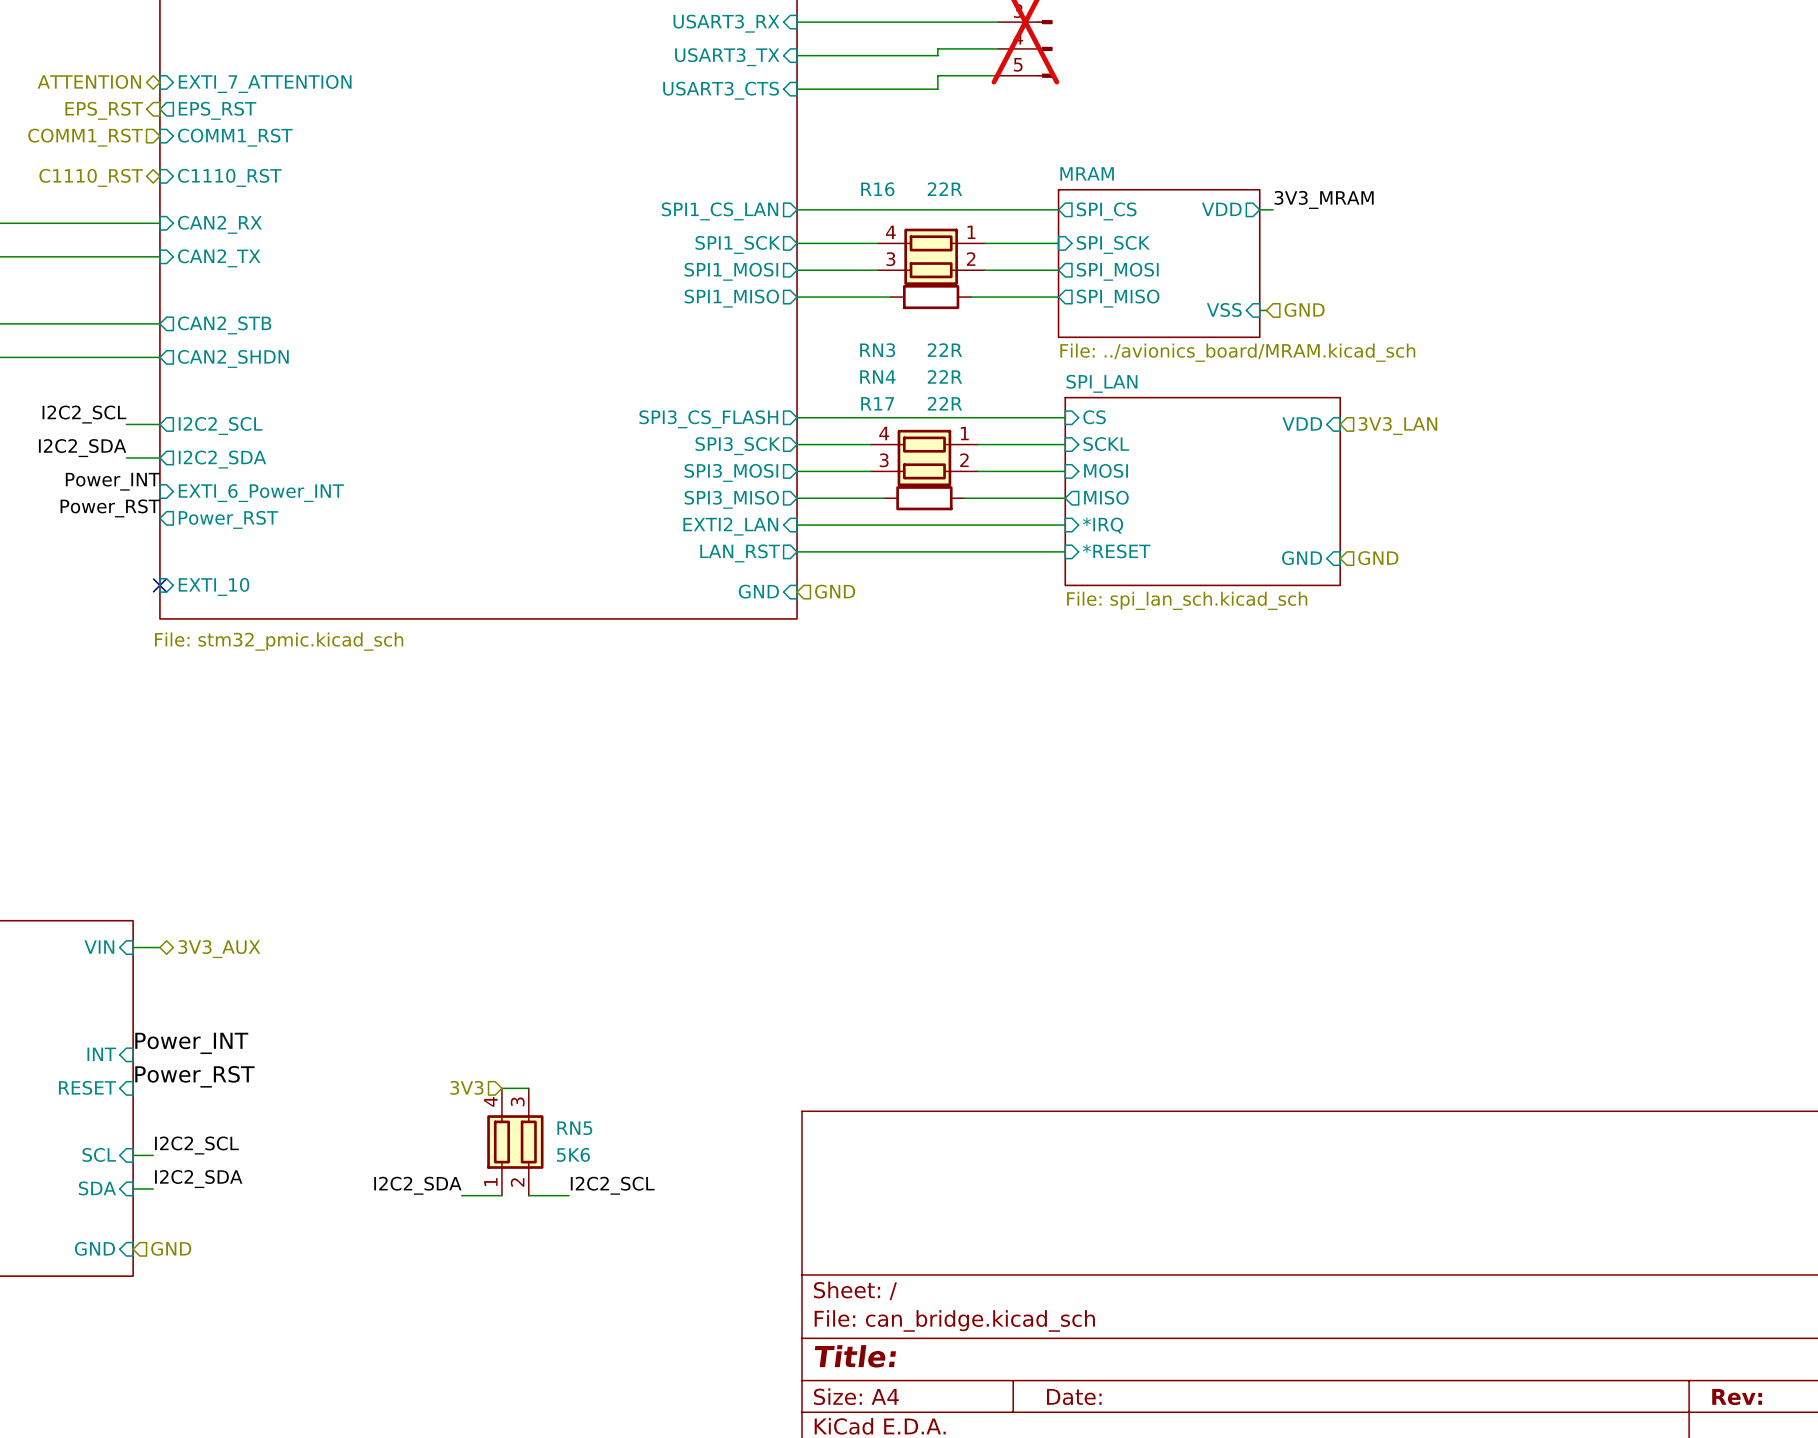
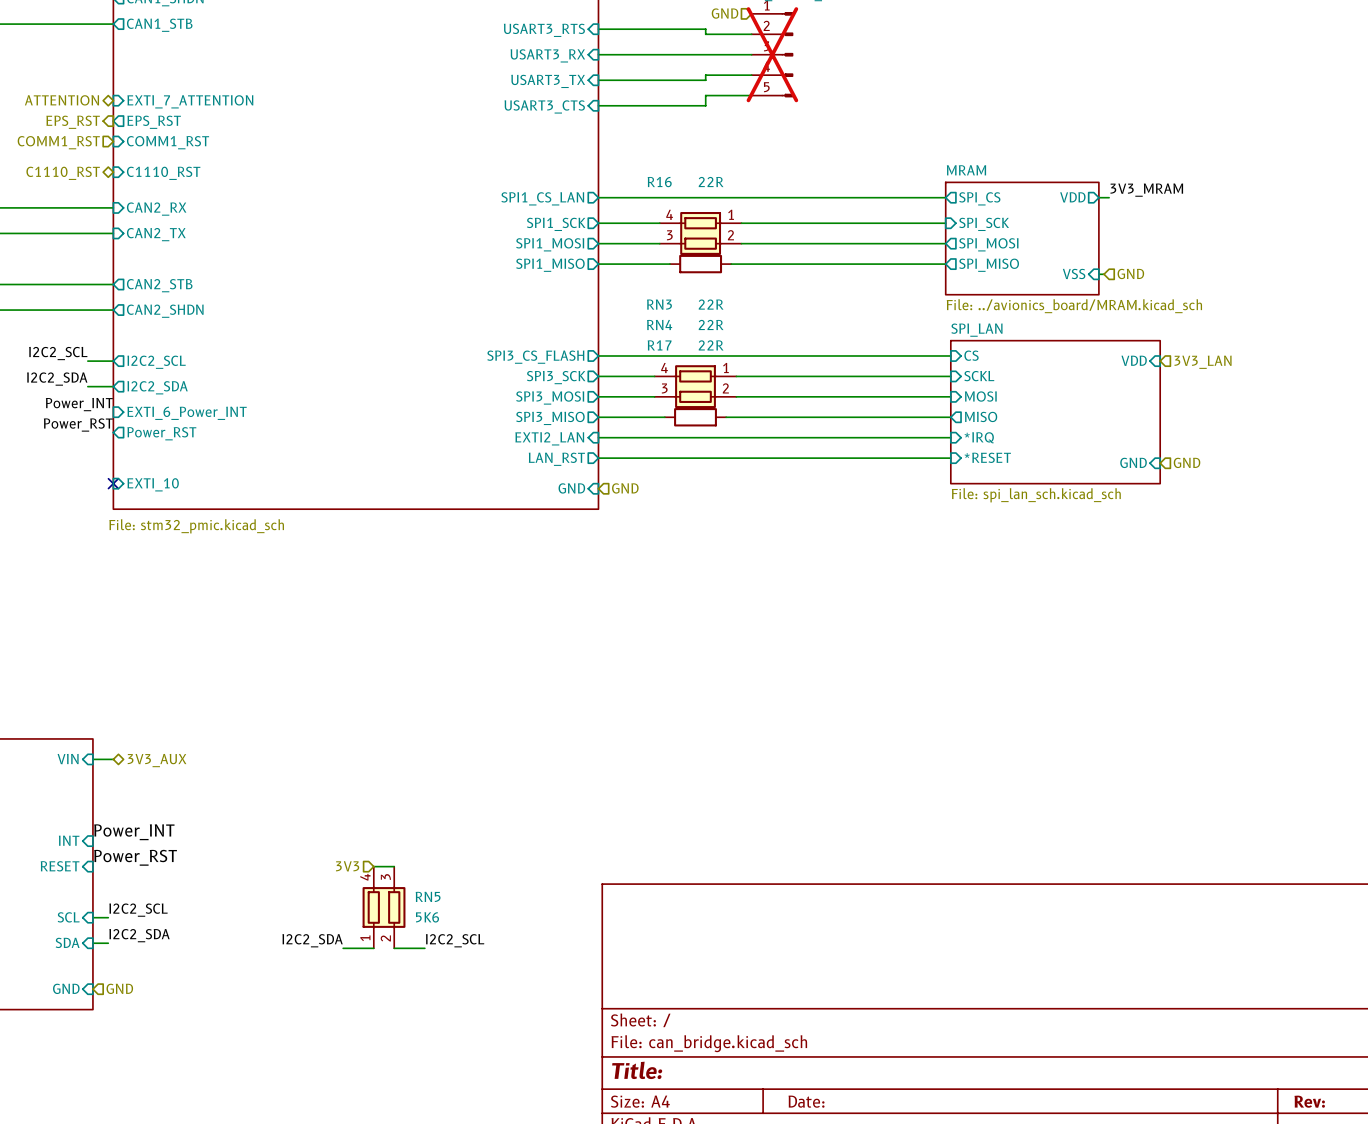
label position: 3V3_MRAM (1324, 199) -> 3V3_MRAM (1146, 190)
wire: none -> (797, 197) (945, 197)
sheet pin: VDD (1221, 209) -> none
wire: (1259, 209) (1273, 209) -> (1098, 197) (1109, 197)
sheet pin: none -> VDD (1072, 197)
sheet pin position: SPI_CS (1106, 211) -> SPI_CS (979, 198)
wire: none -> (797, 223) (945, 223)
sheet pin position: SPI_SCK (1113, 244) -> SPI_SCK (984, 224)
sheet MRAM position: (1159, 263) -> (1022, 238)
wire: none -> (797, 243) (945, 243)
sheet pin position: SPI_MOSI (1117, 271) -> SPI_MOSI (988, 244)
wire: none -> (797, 264) (945, 264)
sheet pin position: SPI_MISO (1118, 298) -> SPI_MISO (989, 265)
sheet pin position: VSS (1224, 309) -> VSS (1074, 273)
hierarchical label: GND (1304, 309) -> none
hierarchical label: none -> GND (1130, 273)
wire: (1259, 310) (1266, 310) -> (1098, 274) (1104, 274)
wire: none -> (802, 355) (950, 355)
sheet pin position: CS (1094, 417) -> CS (971, 355)
sheet pin: VDD (1302, 423) -> none
sheet pin: none -> VDD (1134, 360)
hierarchical label position: 3V3_LAN (1397, 426) -> 3V3_LAN (1203, 362)
wire: none -> (802, 376) (950, 376)
sheet pin position: SCKL (1106, 444) -> SCKL (979, 376)
sheet pin position: MOSI (1106, 470) -> MOSI (980, 396)
wire: none -> (802, 396) (950, 396)
sheet SPI_LAN position: (1202, 491) -> (1055, 412)
sheet pin position: MISO (1106, 497) -> MISO (981, 416)
wire: none -> (802, 417) (950, 417)
wire: none -> (802, 437) (950, 437)
sheet pin position: *IRQ (1103, 525) -> *IRQ (979, 437)
wire: none -> (802, 458) (950, 458)
sheet pin position: *RESET (1116, 551) -> *RESET (987, 457)
sheet pin position: GND (1302, 558) -> GND (1133, 462)
hierarchical label: GND (1378, 558) -> none
hierarchical label: none -> GND (1187, 462)

